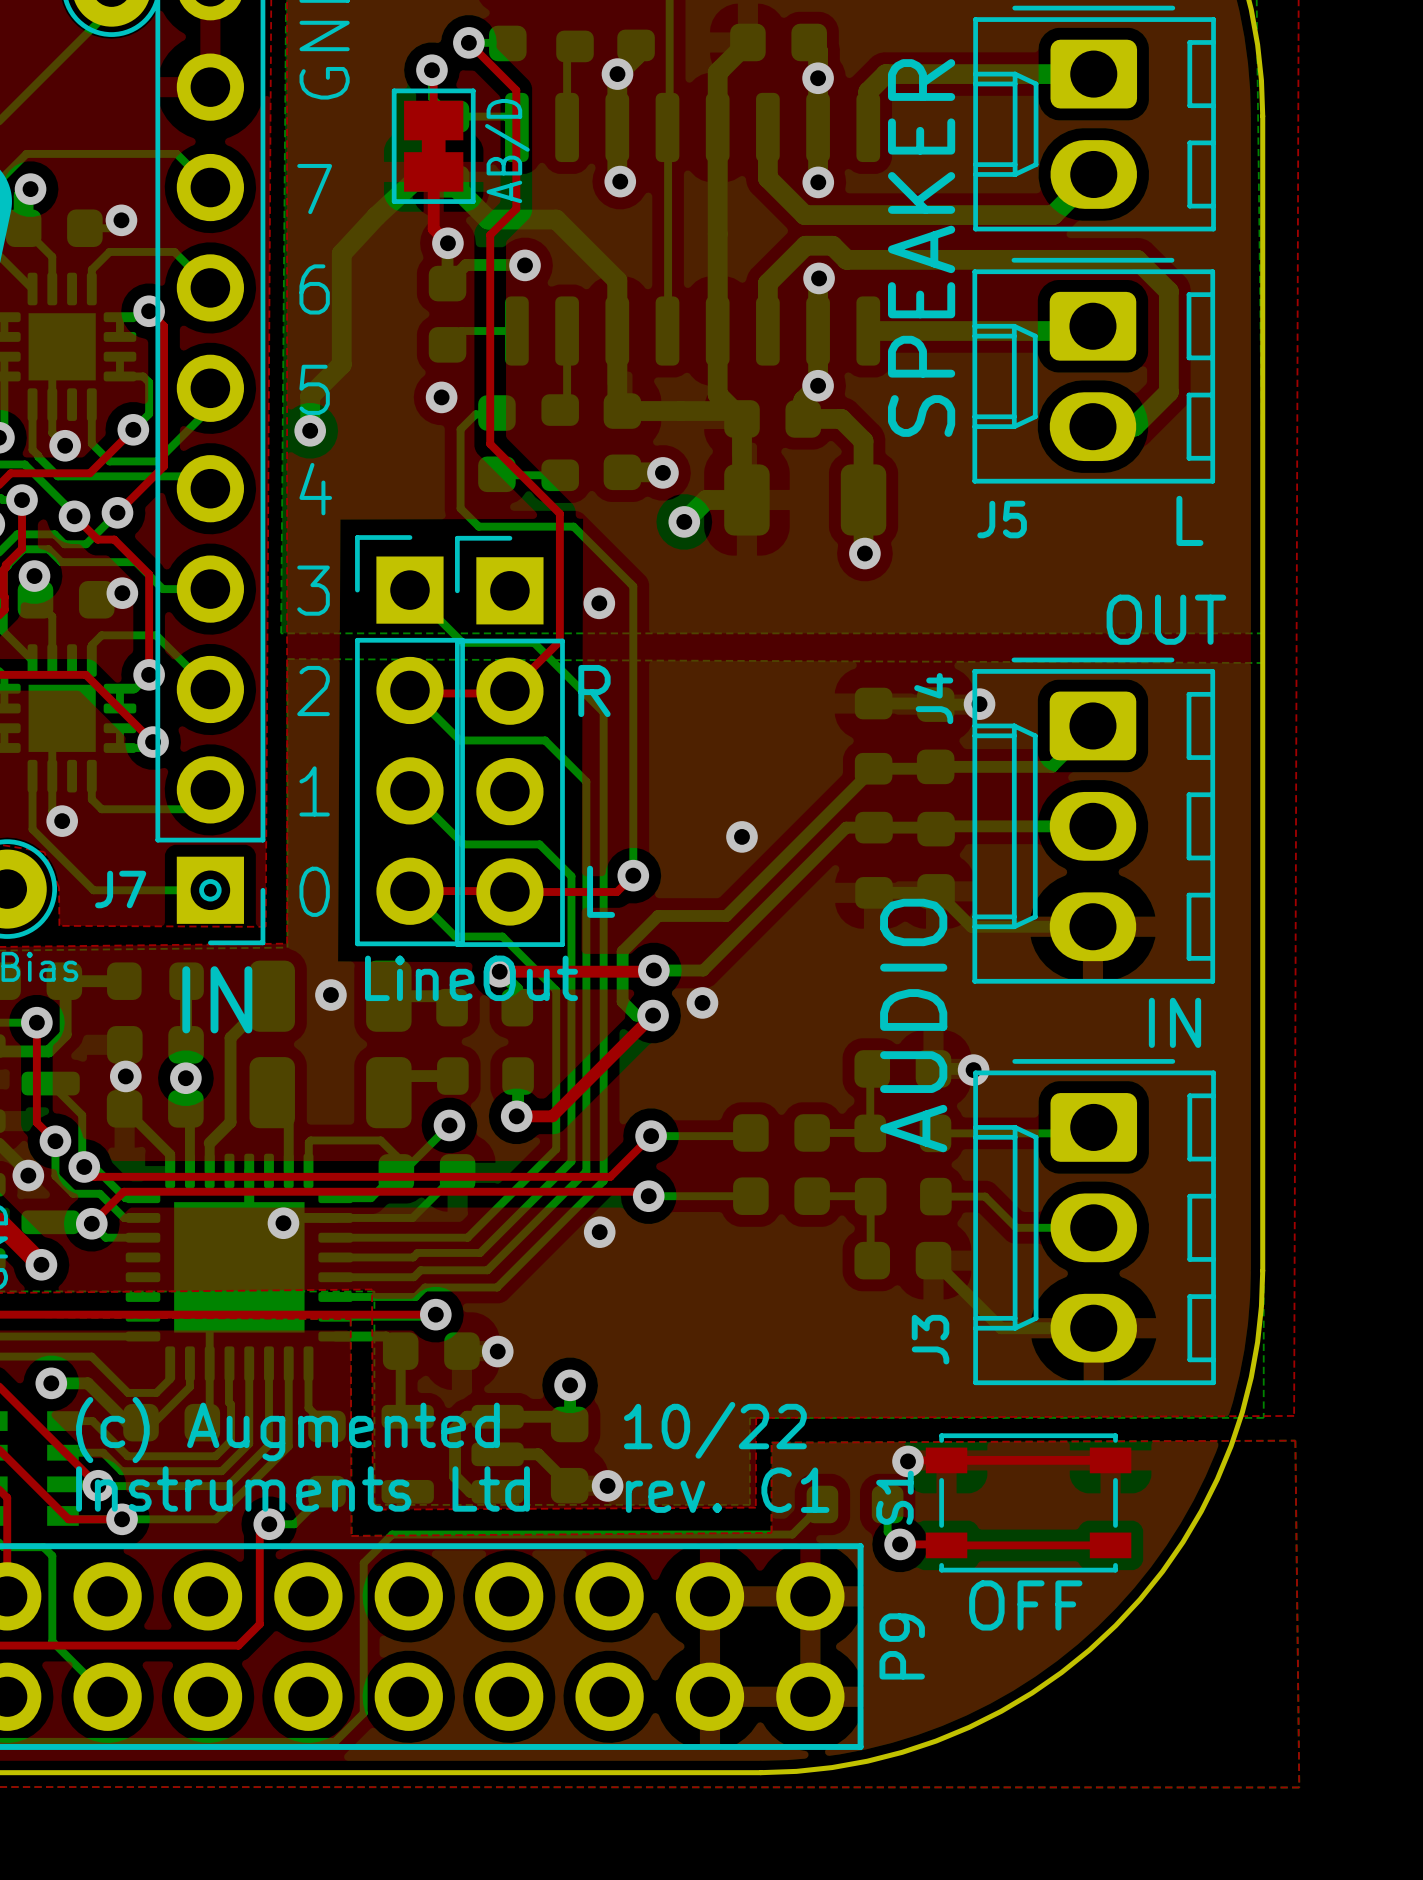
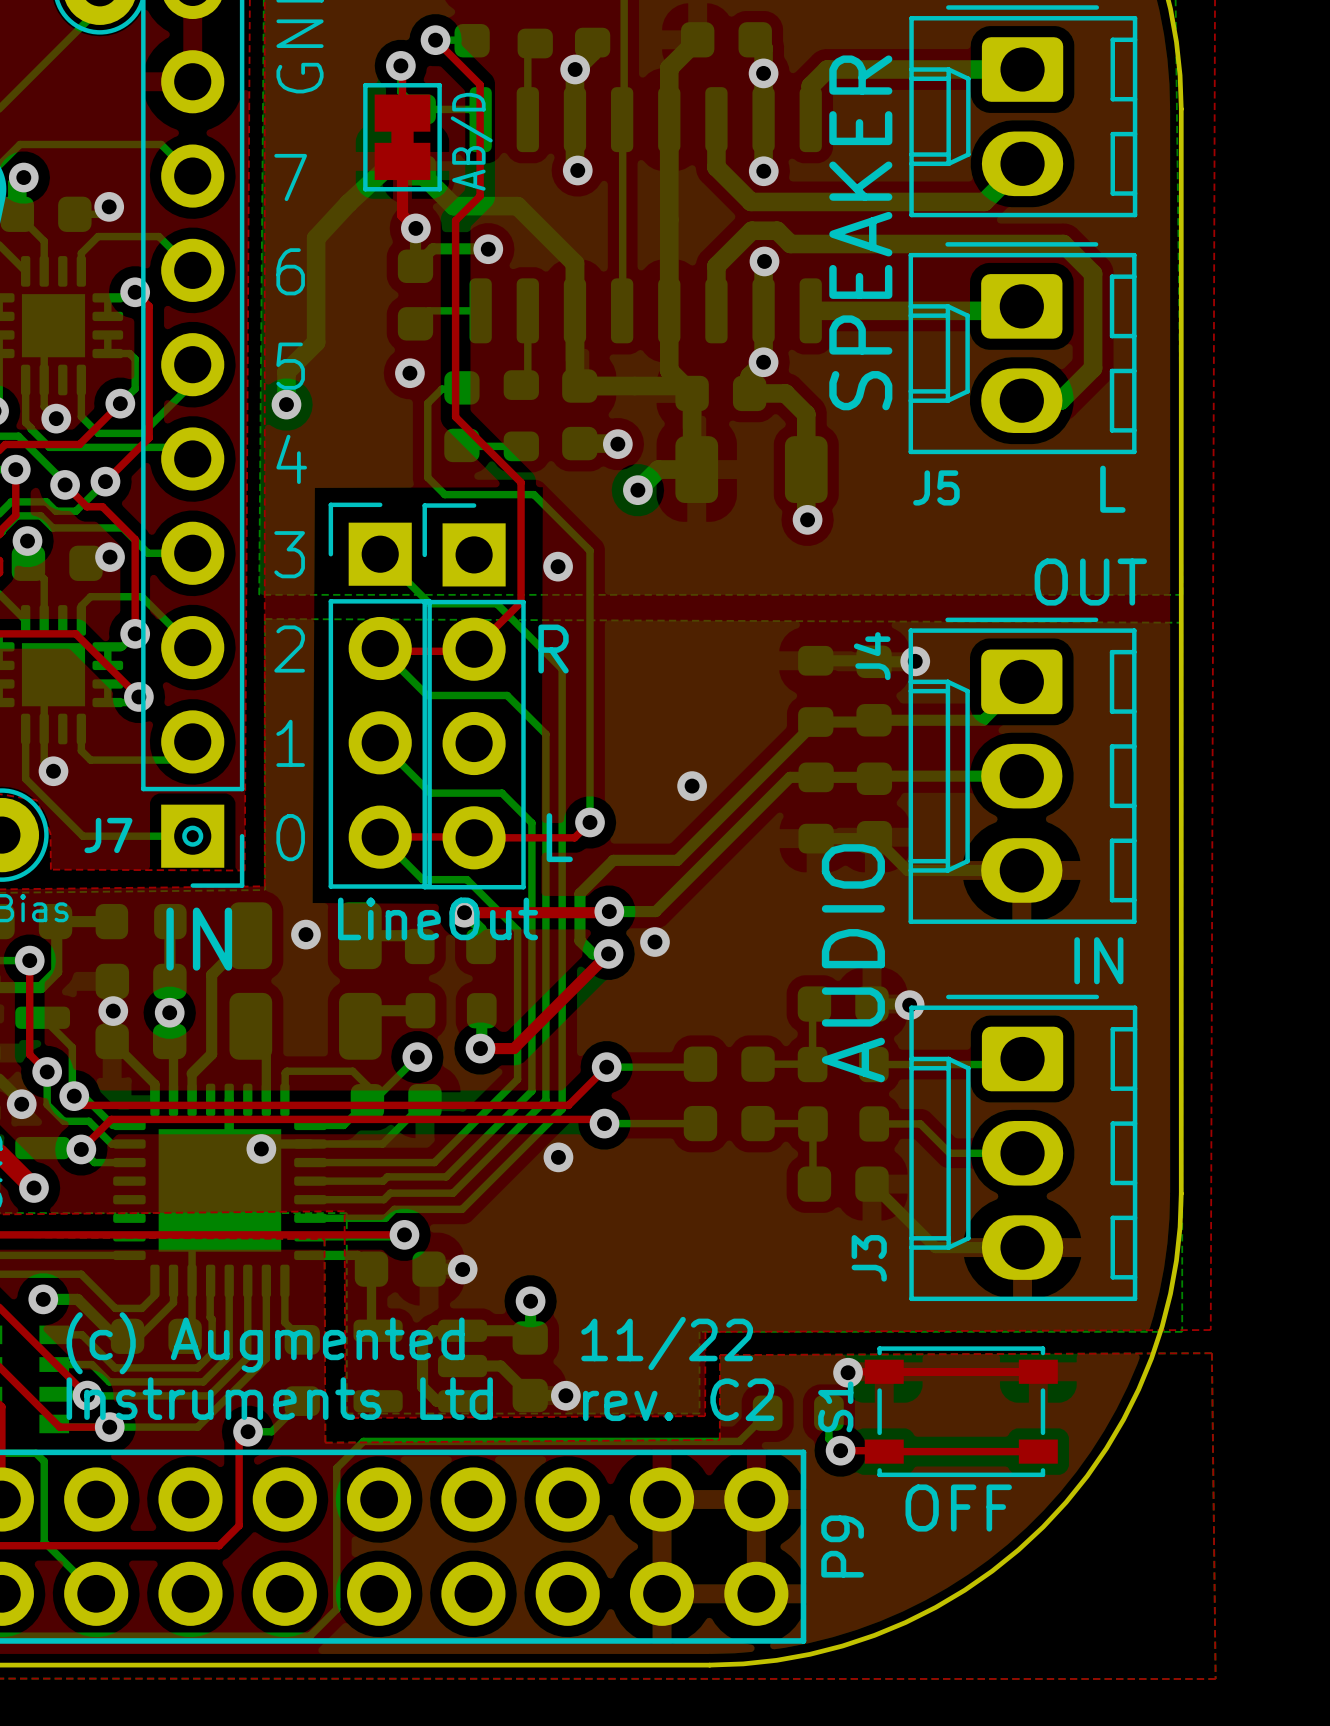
text: 10/22 (715, 1430) -> 11/22 (667, 1343)
text: rev. C1 (727, 1490) -> rev. C2 (678, 1399)

